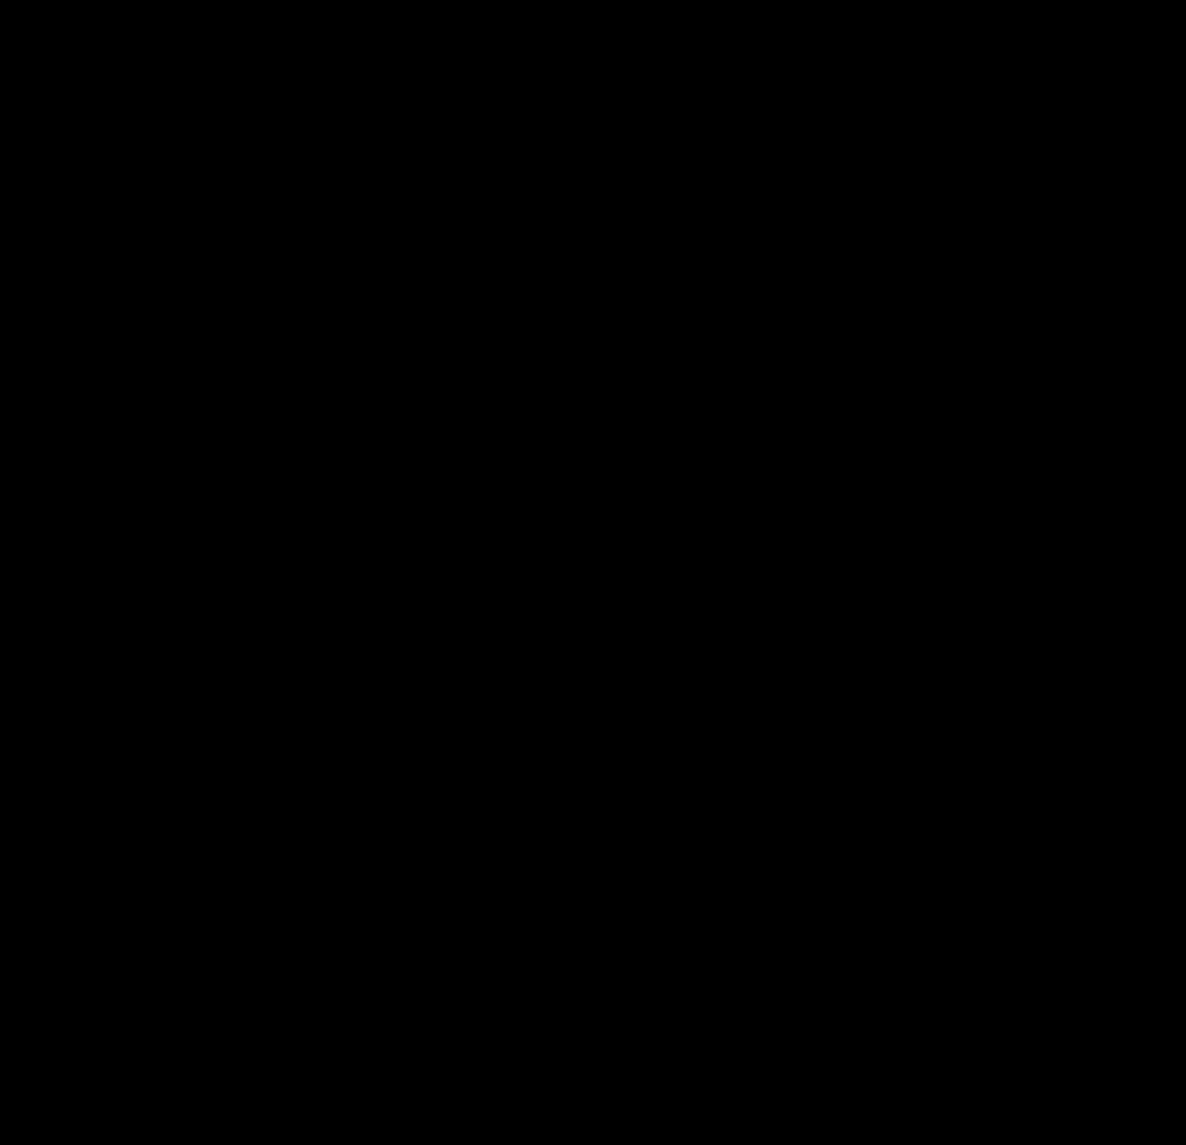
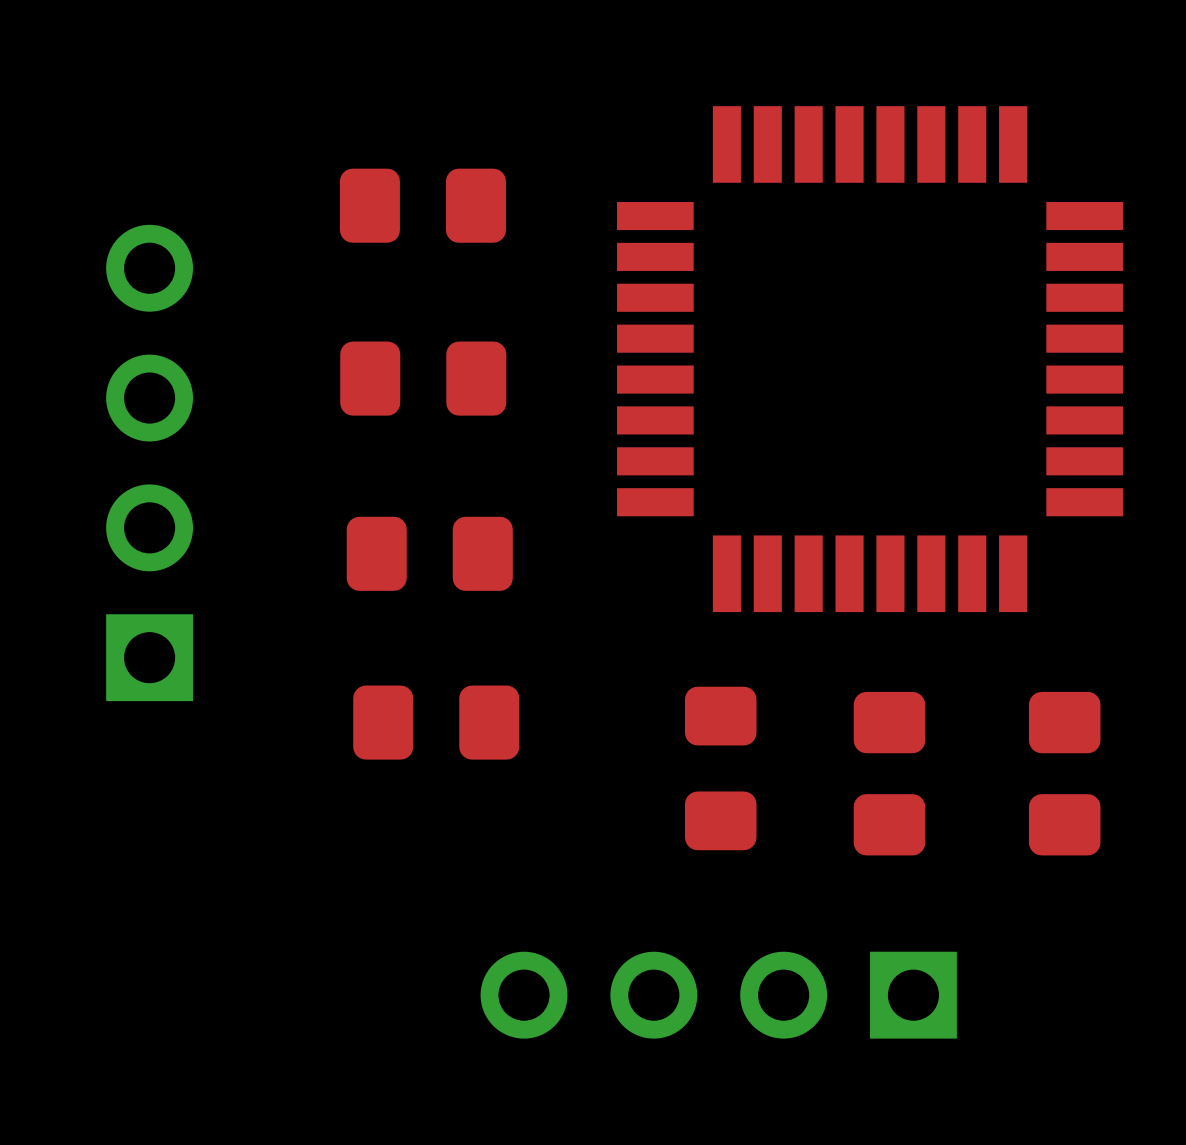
part: none -> (422, 205)
part: none -> (870, 359)
part: none -> (423, 378)
part: none -> (149, 462)
part: none -> (429, 553)
part: none -> (436, 722)
part: none -> (720, 768)
part: none -> (889, 773)
part: none -> (1064, 773)
part: none -> (718, 995)

